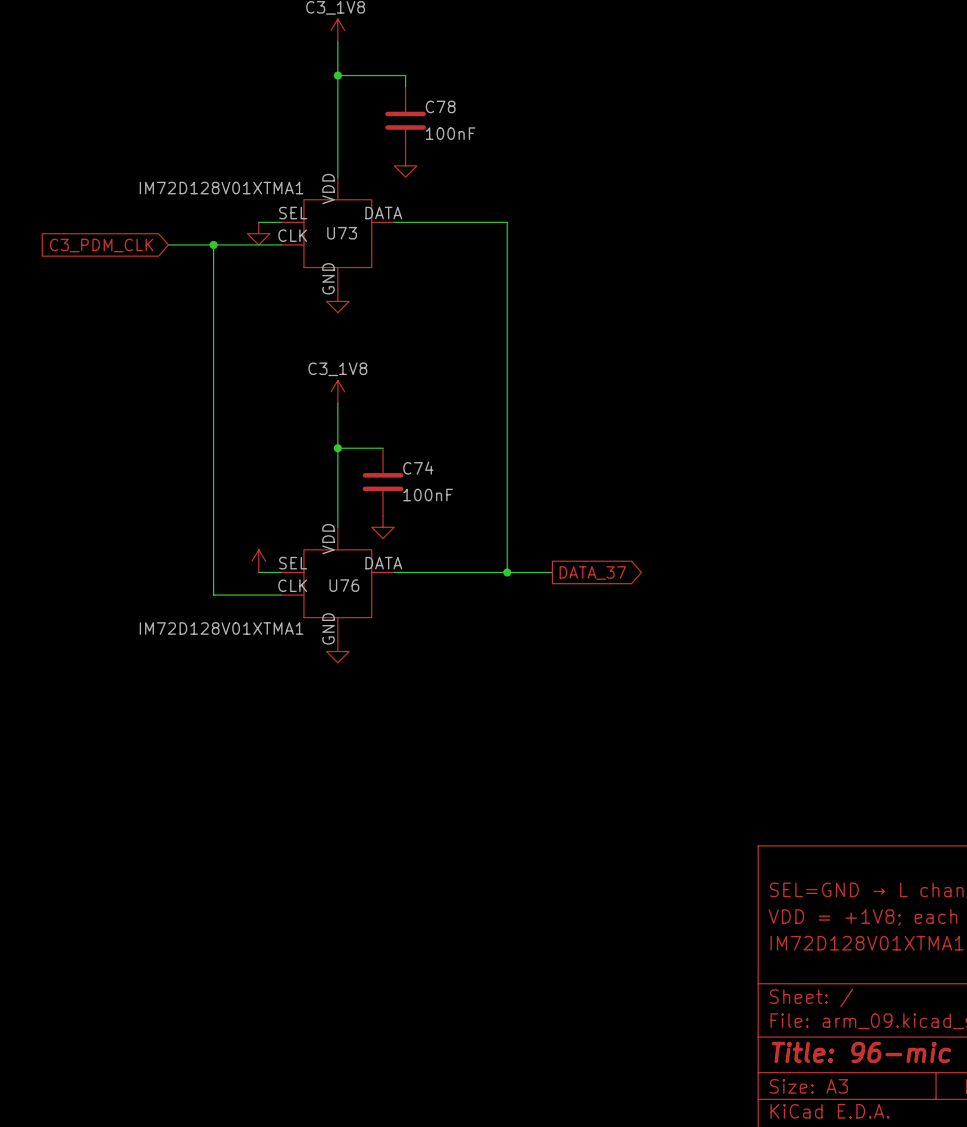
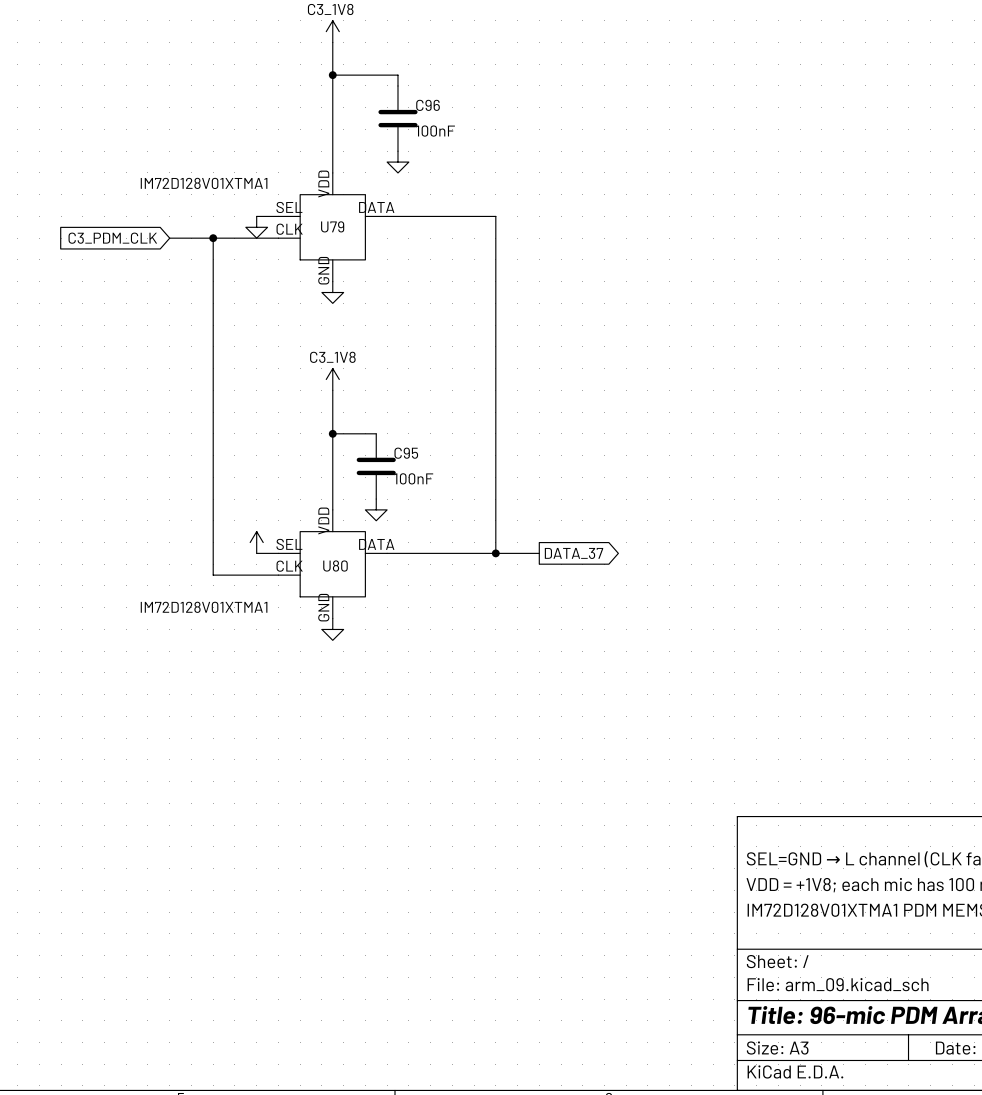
C78 name: C78 (440, 106) -> C96 (428, 105)
U73 name: U73 (342, 233) -> U79 (332, 226)
C74 name: C74 (418, 468) -> C95 (406, 453)
U76 name: U76 (344, 585) -> U80 (335, 566)

